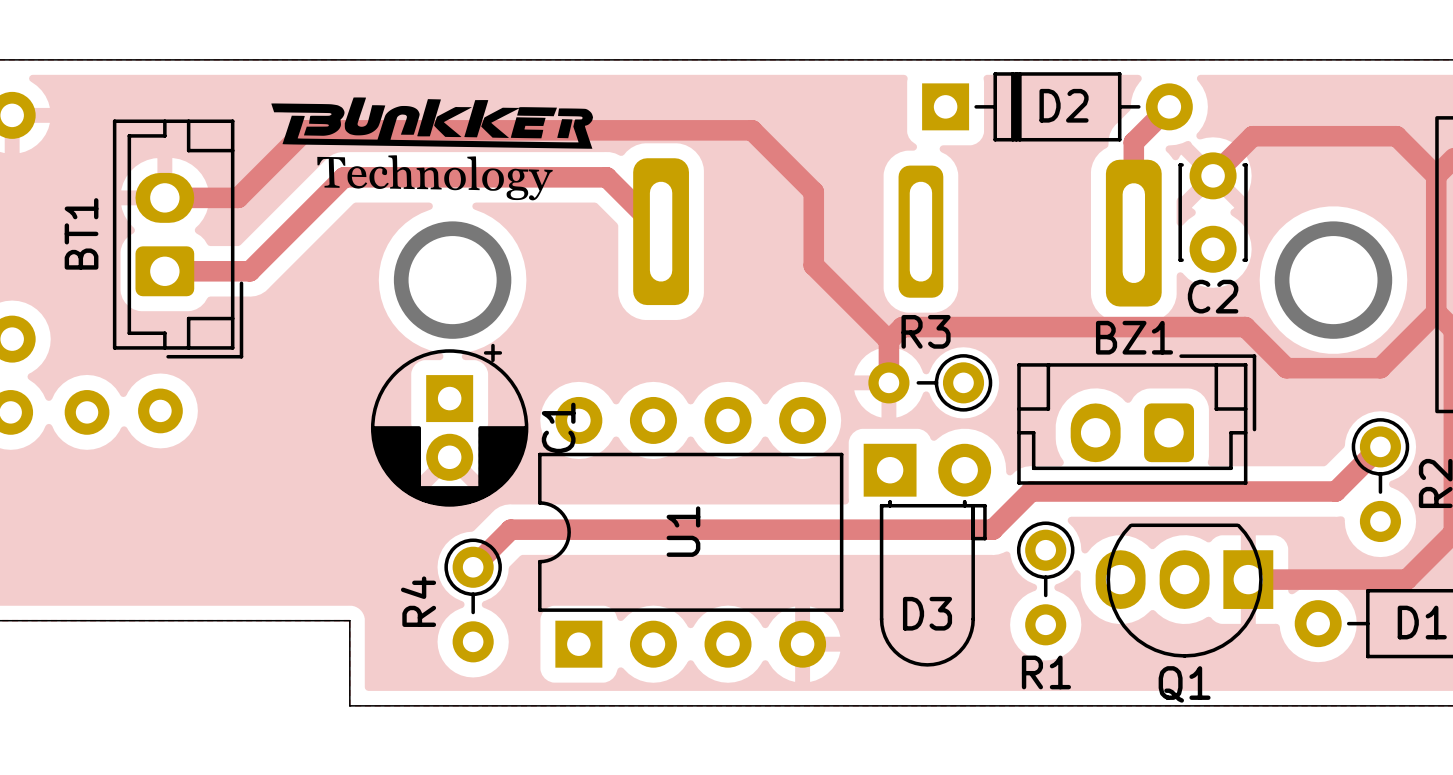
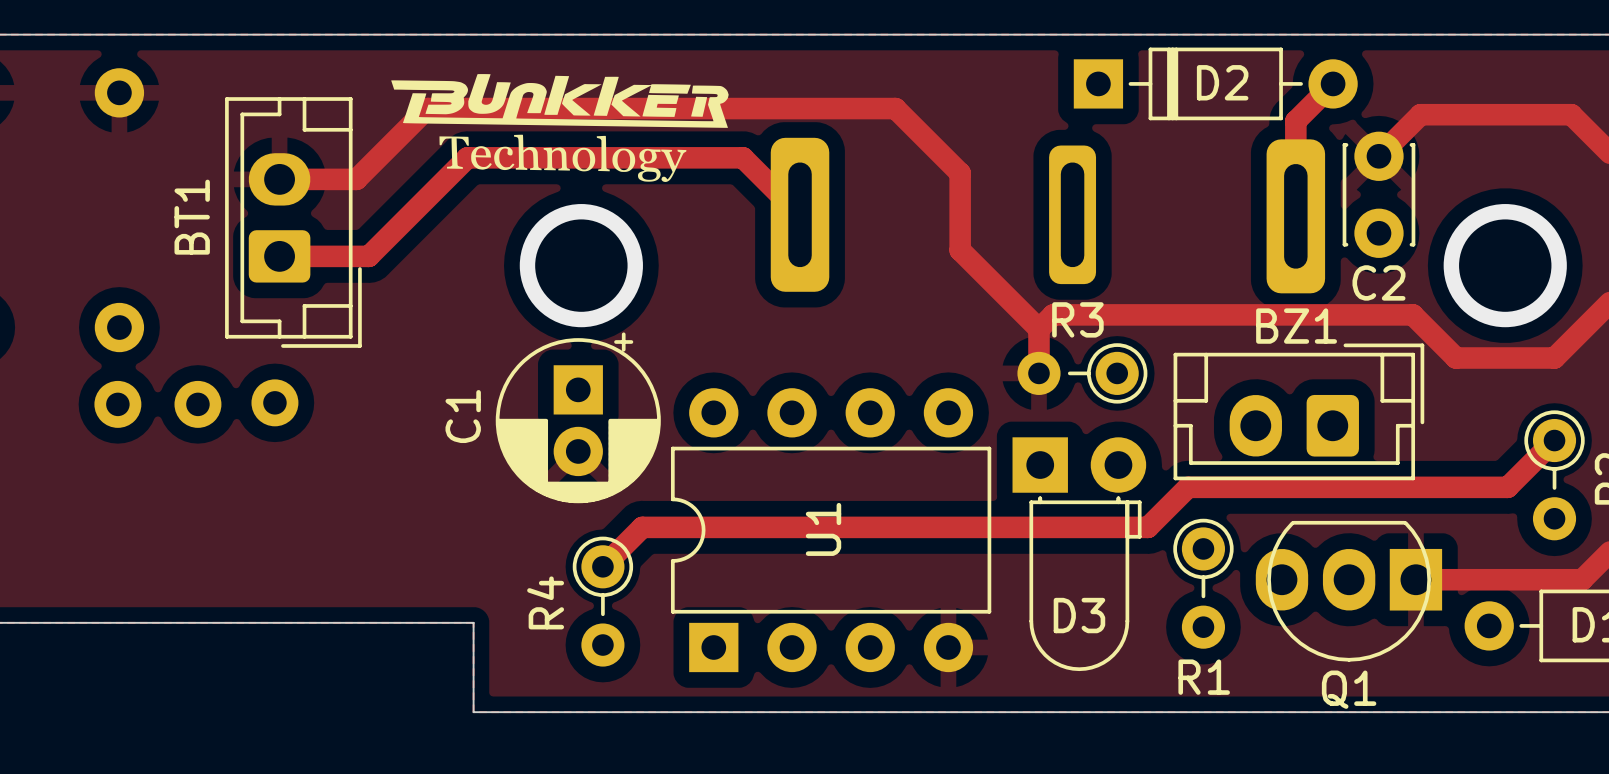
C1 name position: C1 (558, 427) -> C1 (463, 416)

